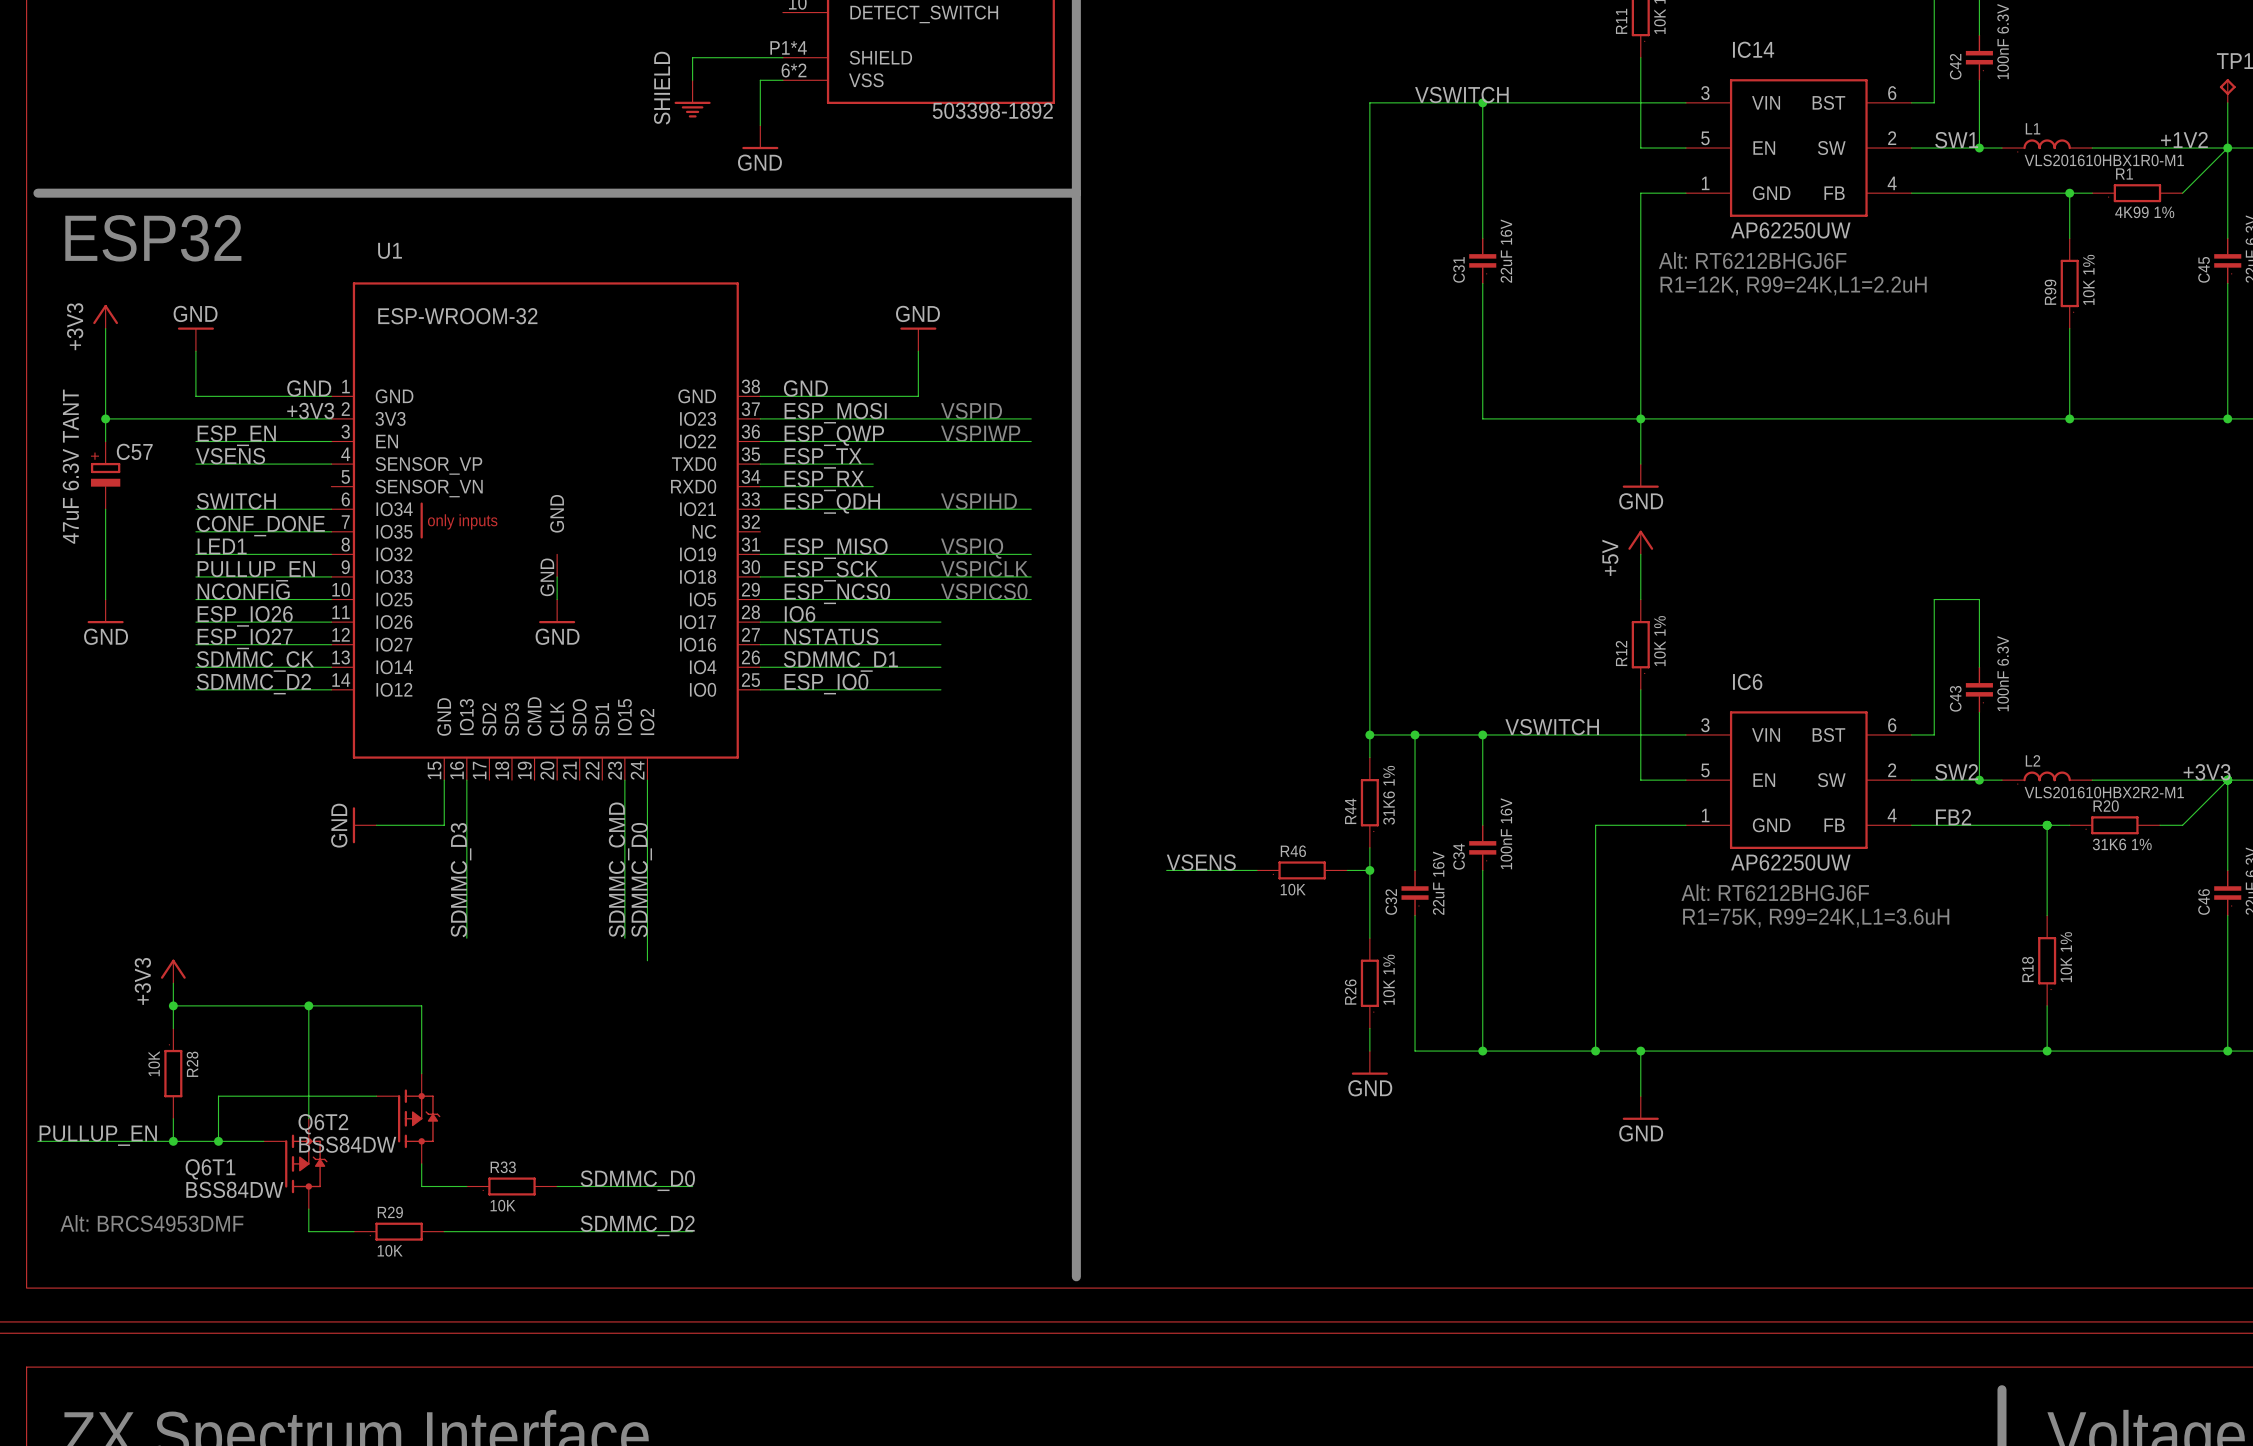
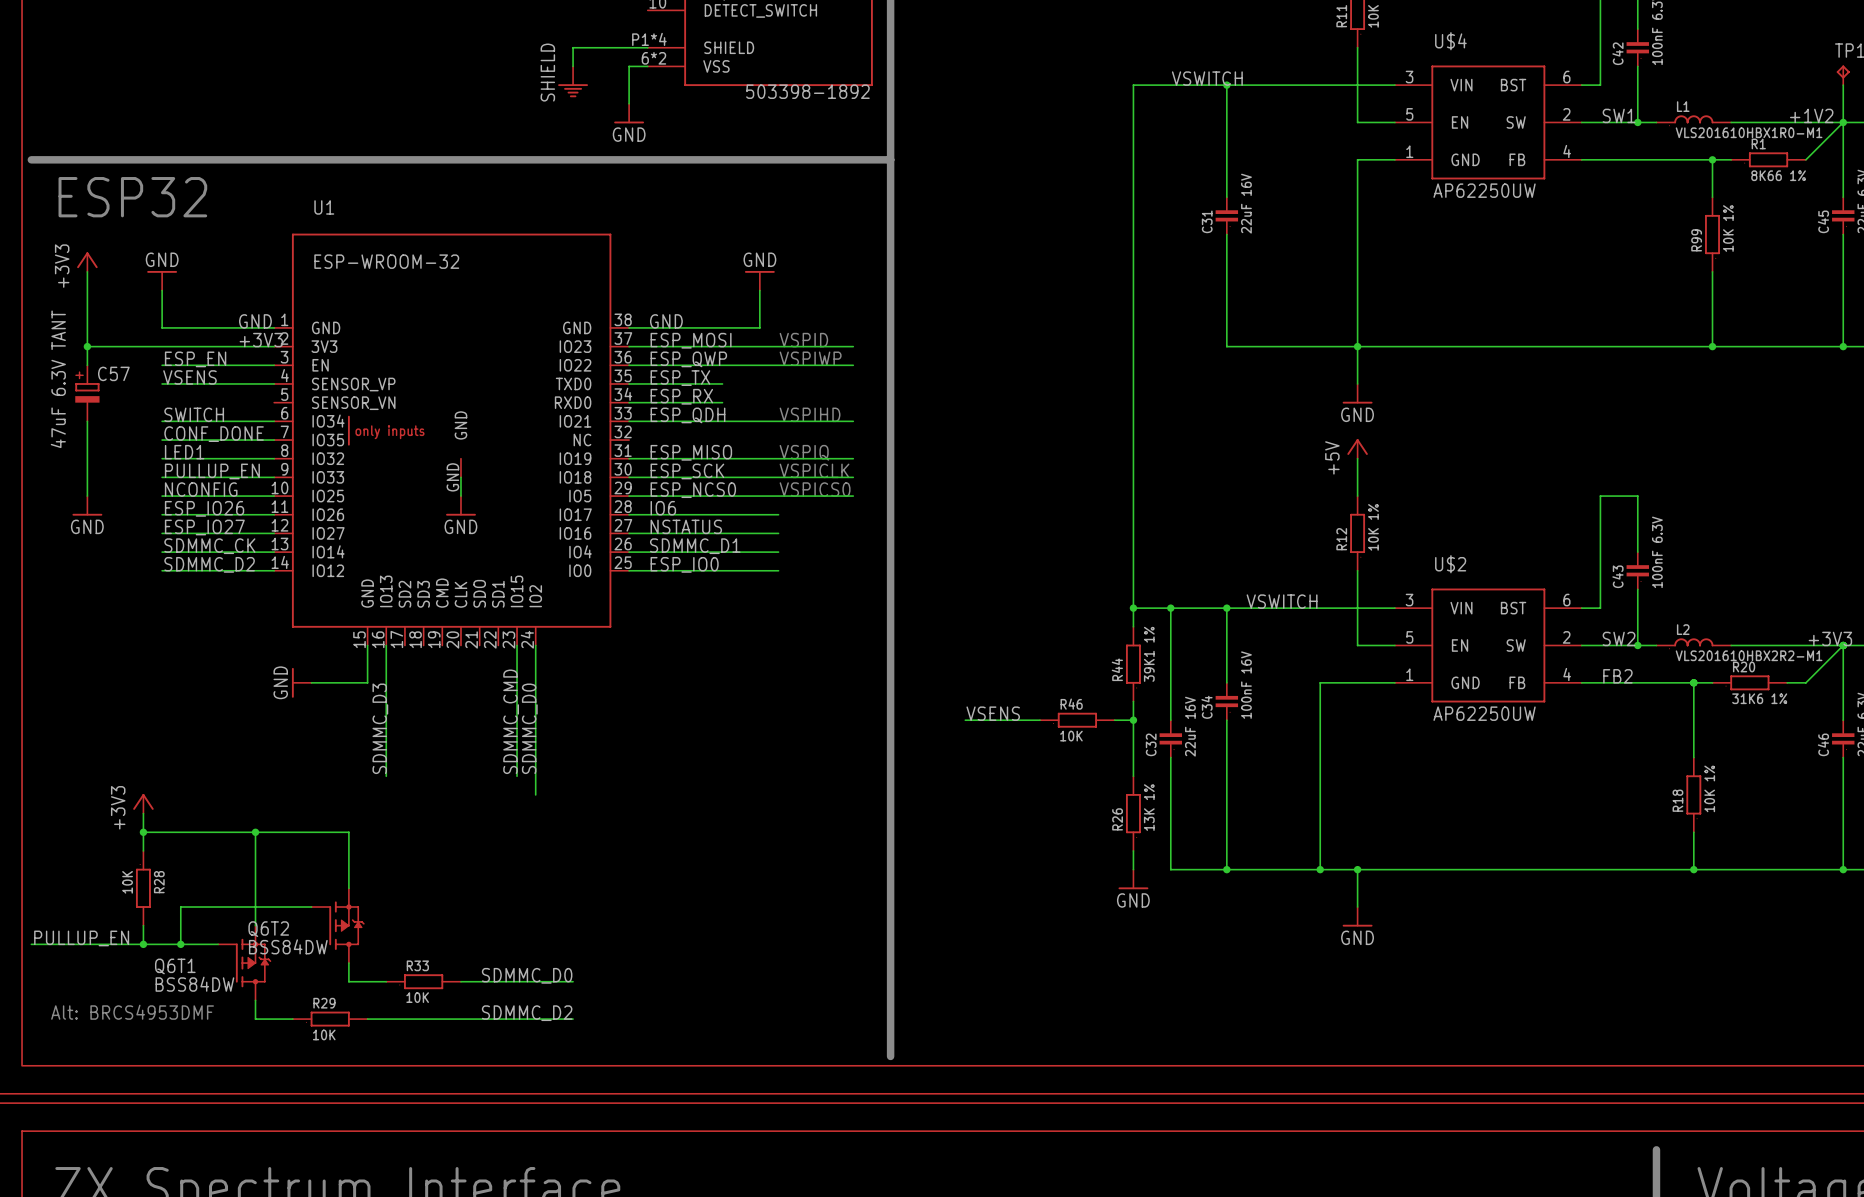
IC14 name: IC14 (1753, 49) -> U$4 (1450, 41)
R1 value: 4K99 1% (2144, 212) -> 8K66 1% (1778, 175)
text: Alt: RT6212BHGJ6F (1752, 260) -> none
text: R1=12K, R99=24K,L1=2.2uH (1793, 285) -> none
IC6 name: IC6 (1747, 681) -> U$2 (1450, 564)
R44 value: 31K6 1% (1389, 795) -> 39K1 1% (1149, 654)
text: Alt: RT6212BHGJ6F (1775, 892) -> none
text: R1=75K, R99=24K,L1=3.6uH (1816, 918) -> none
R26 value: 10K 1% (1389, 979) -> 13K 1% (1149, 807)

